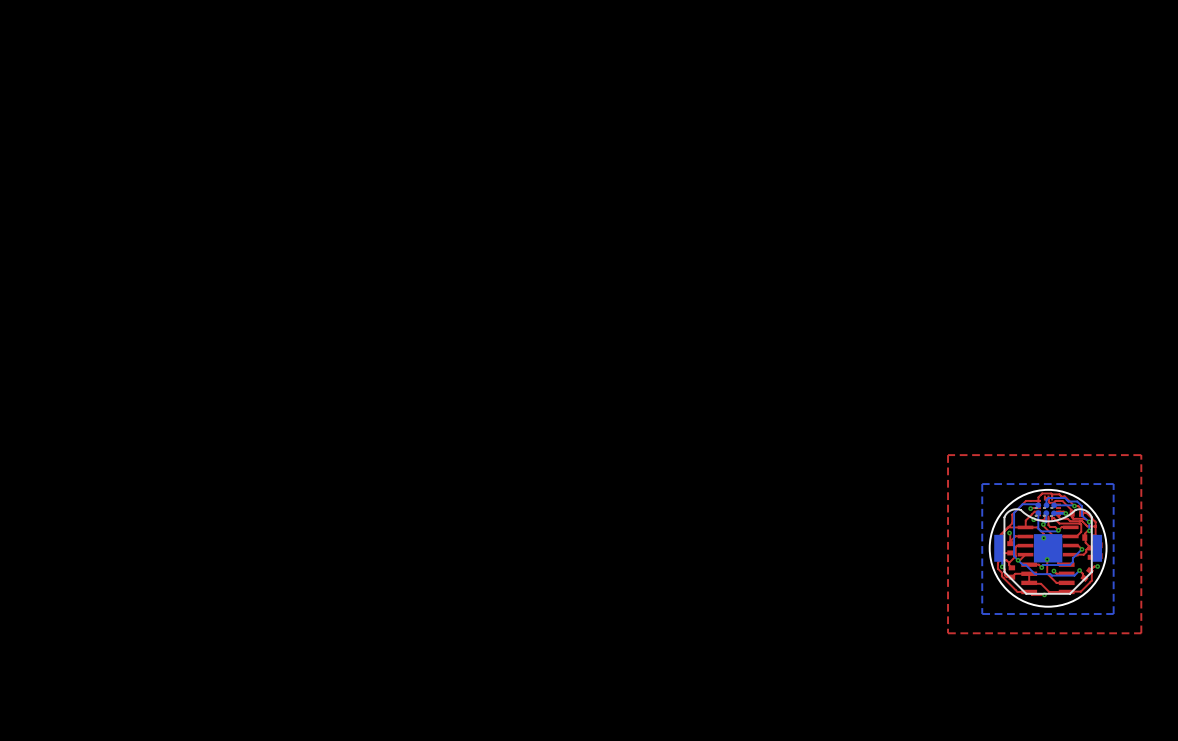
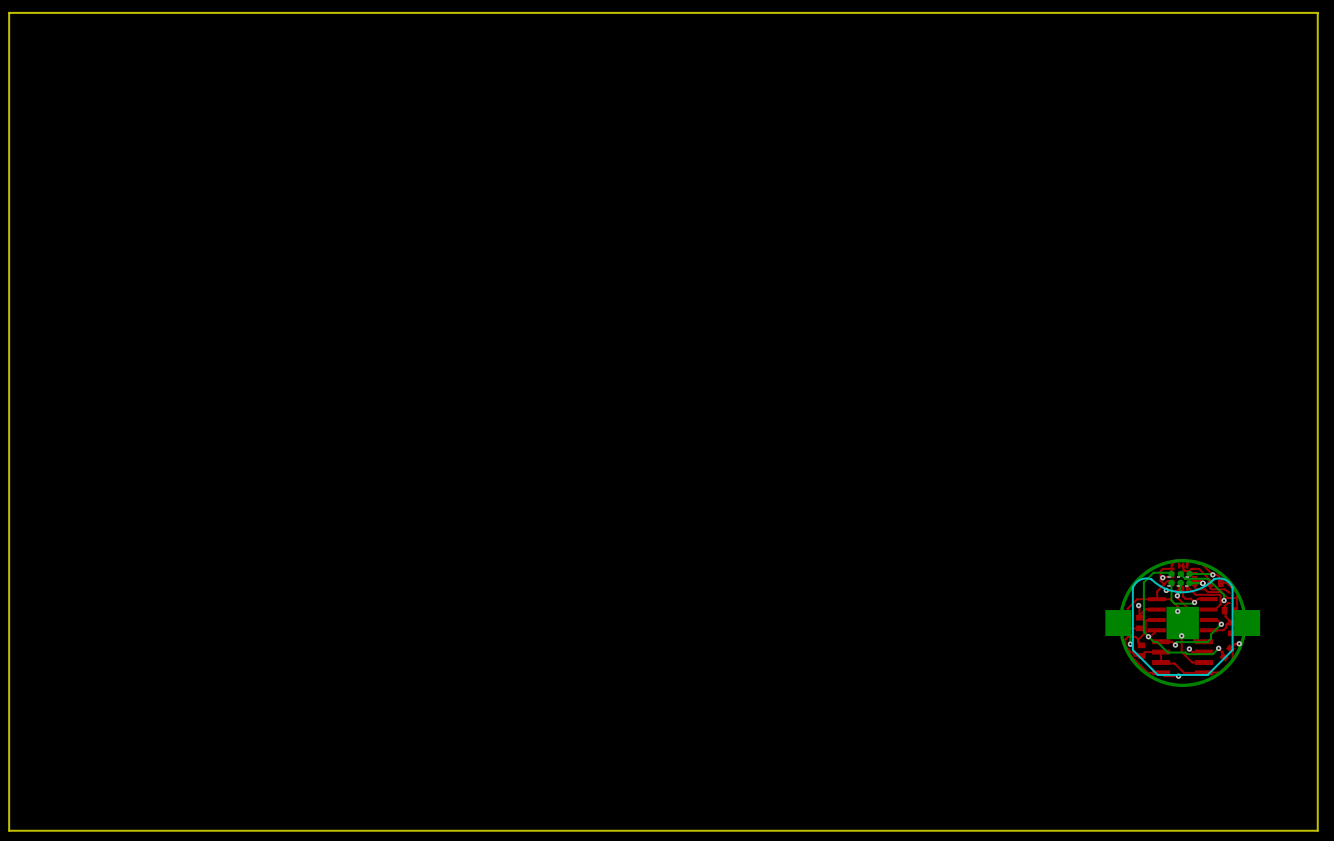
board edge: none -> (1317, 12) (9, 12) (9, 830) (1317, 830) (1317, 12)
top zone outline: (1141, 455) (948, 455) (948, 633) (1141, 633) (1141, 455) -> none
bottom zone outline: (1113, 484) (982, 484) (982, 614) (1113, 614) (1113, 484) -> none
round board edge: [989, 489, 1107, 607] -> none
drawing: none -> [1118, 559, 1247, 688]
top track: (1030, 500) (1025, 500) (1012, 514) (1012, 523) (1008, 527) -> (1162, 568) (1160, 571) (1160, 580) (1164, 584)
bottom track: (1046, 505) (1048, 498) (1065, 498) (1068, 501) (1077, 501) (1081, 506) (1081, 515) (1089, 521) (1089, 530) -> none
bottom track: none -> (1180, 574) (1185, 578) (1207, 578) (1224, 594) (1224, 600)
part footprint: [994, 508, 1103, 595] -> [1105, 577, 1261, 676]
via: (1089, 521) -> none
via: none -> (1224, 600)
via: (1089, 530) -> none

